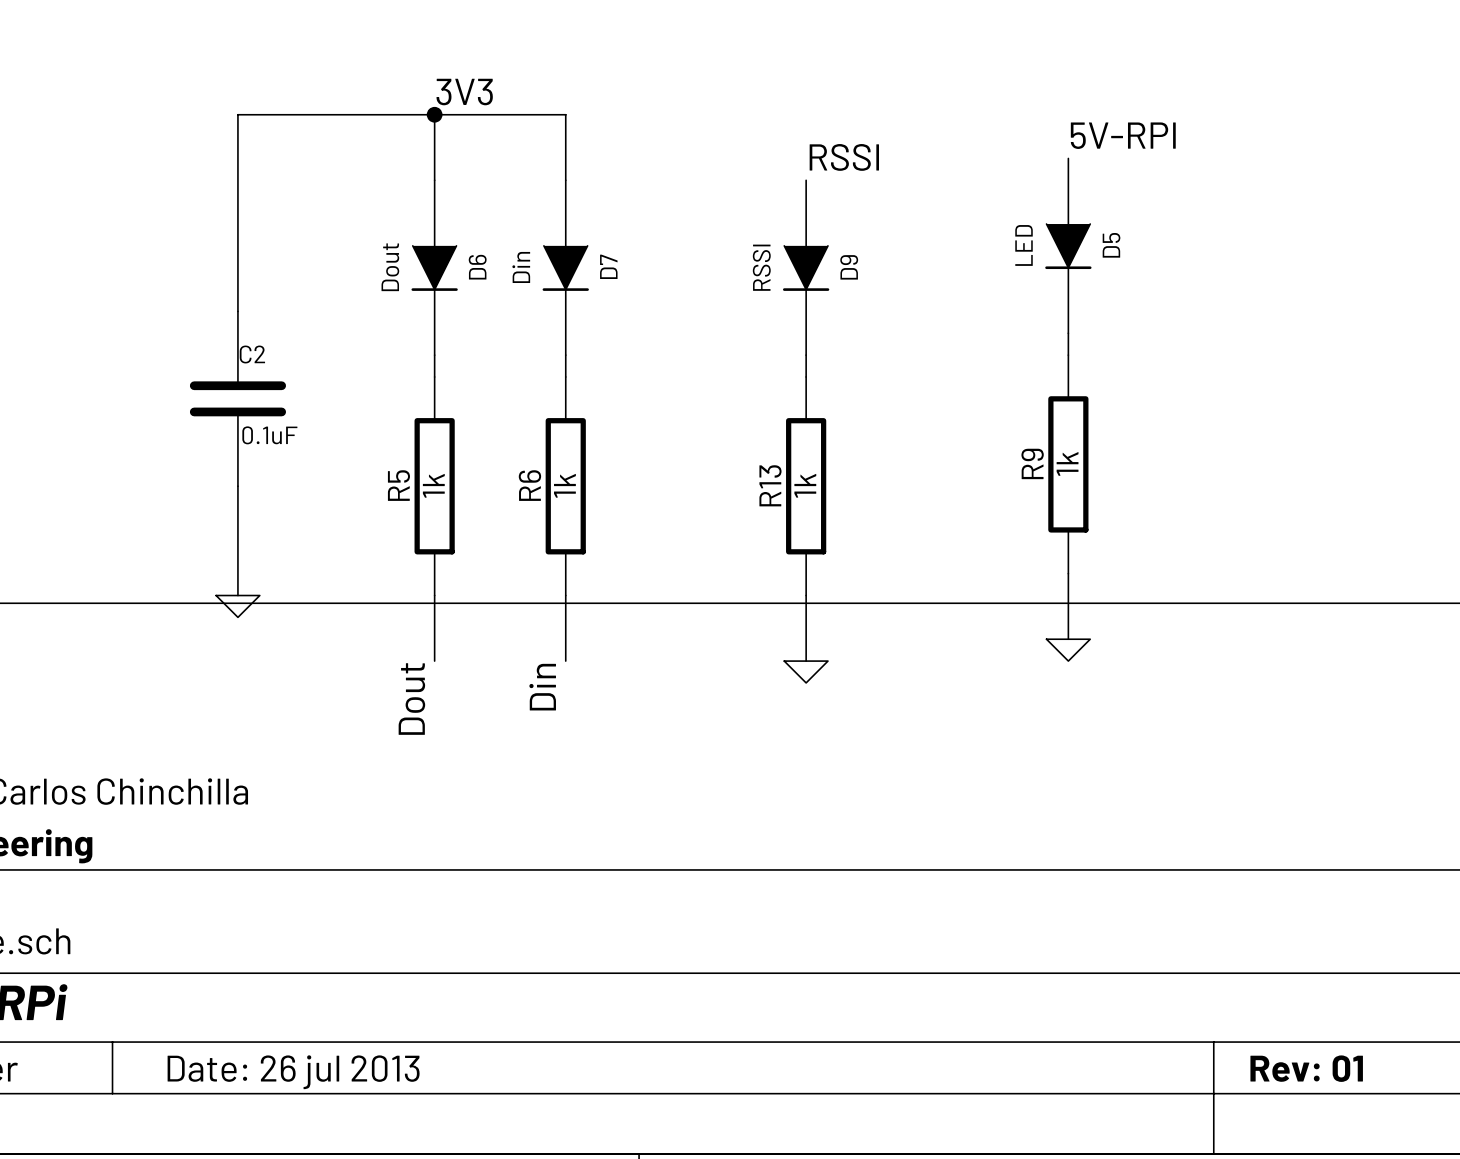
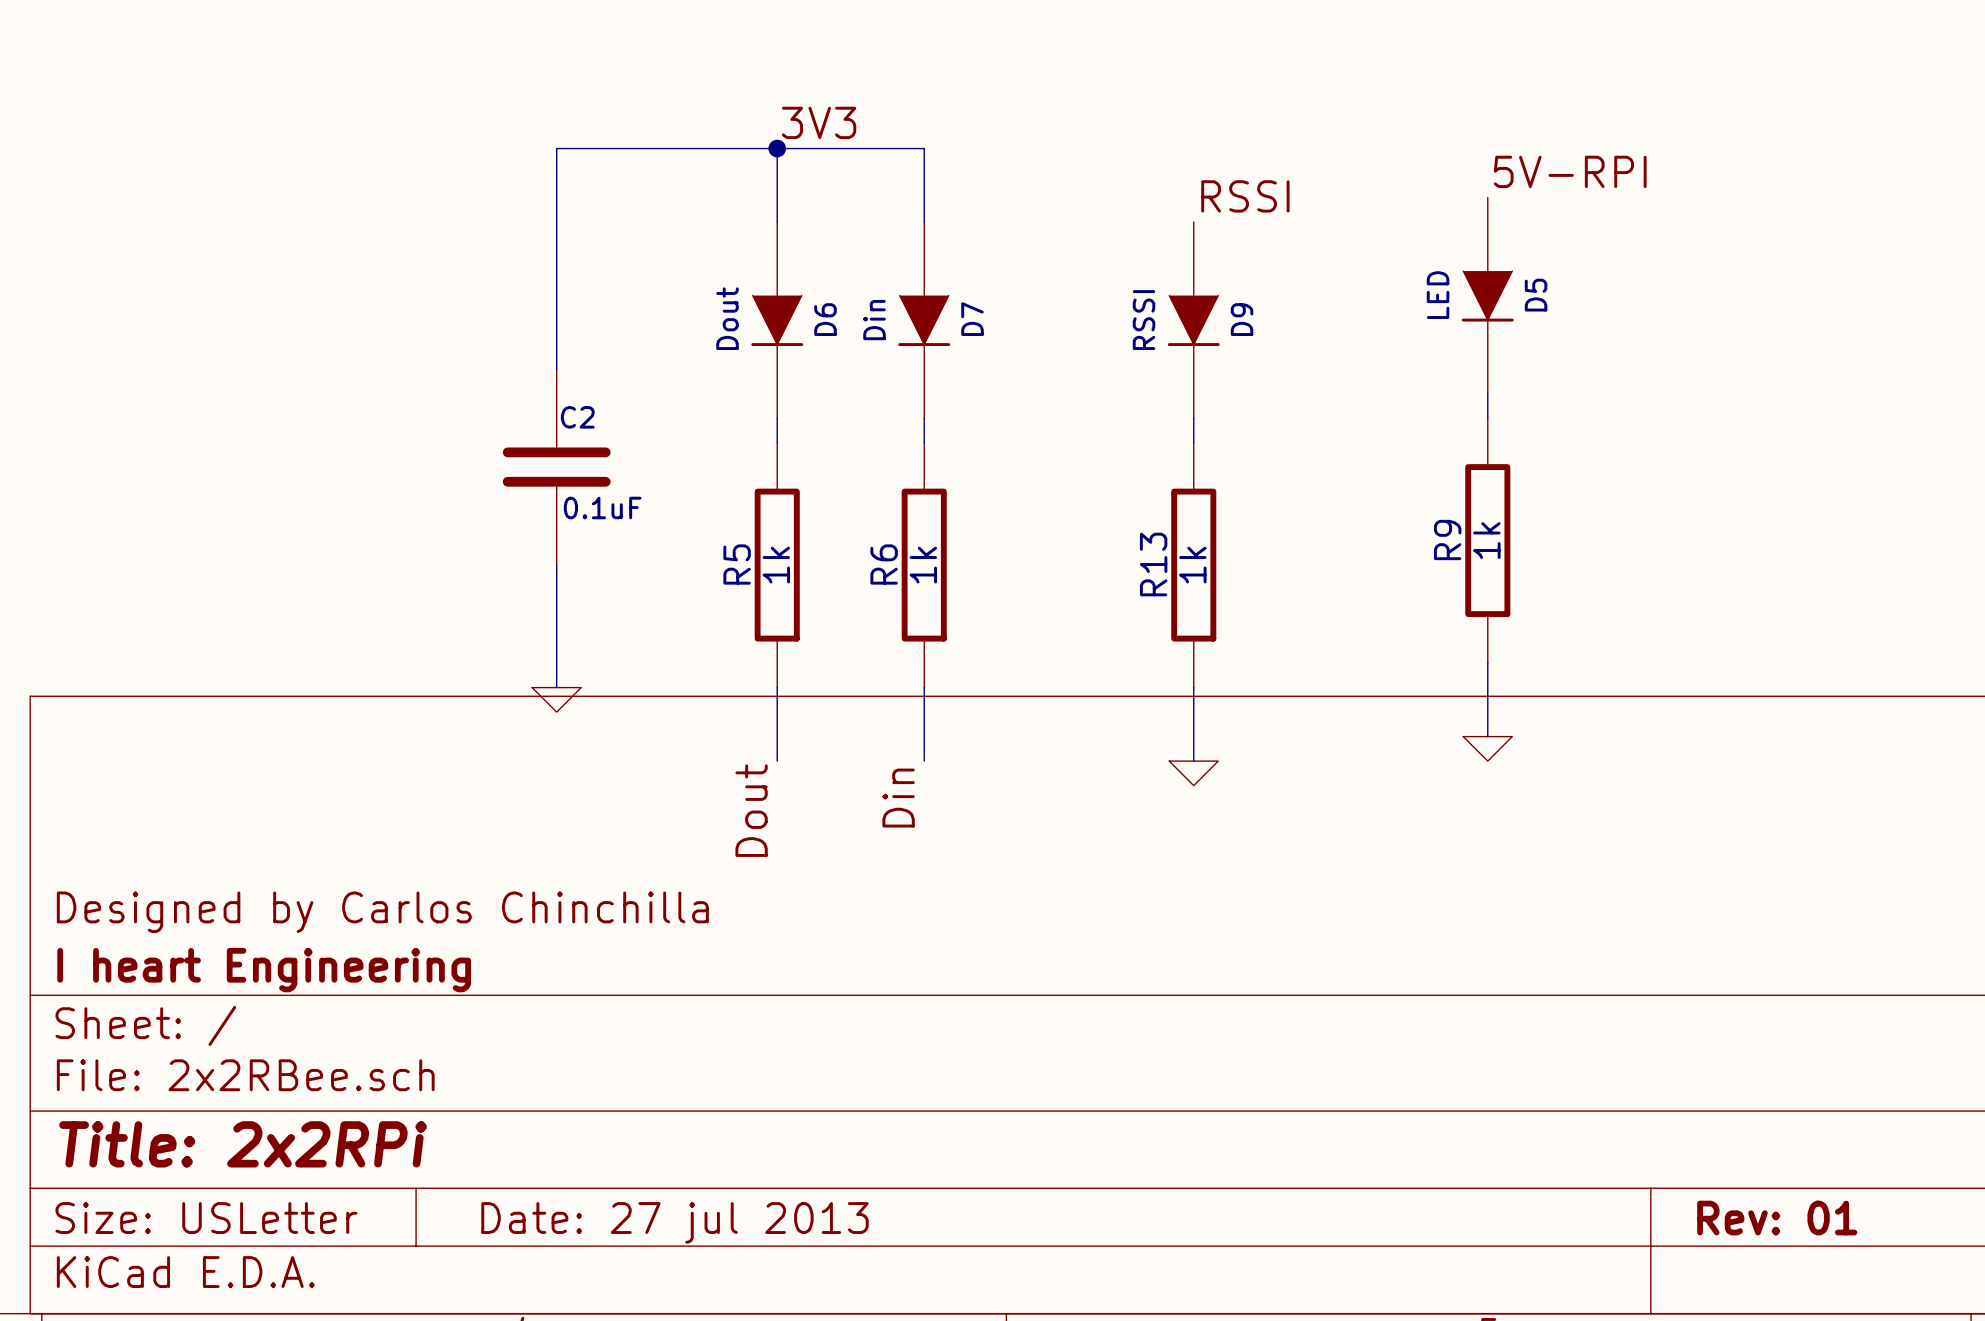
title block: Date: 26 jul 2013 (293, 1072) -> Date: 27 jul 2013 (675, 1222)

